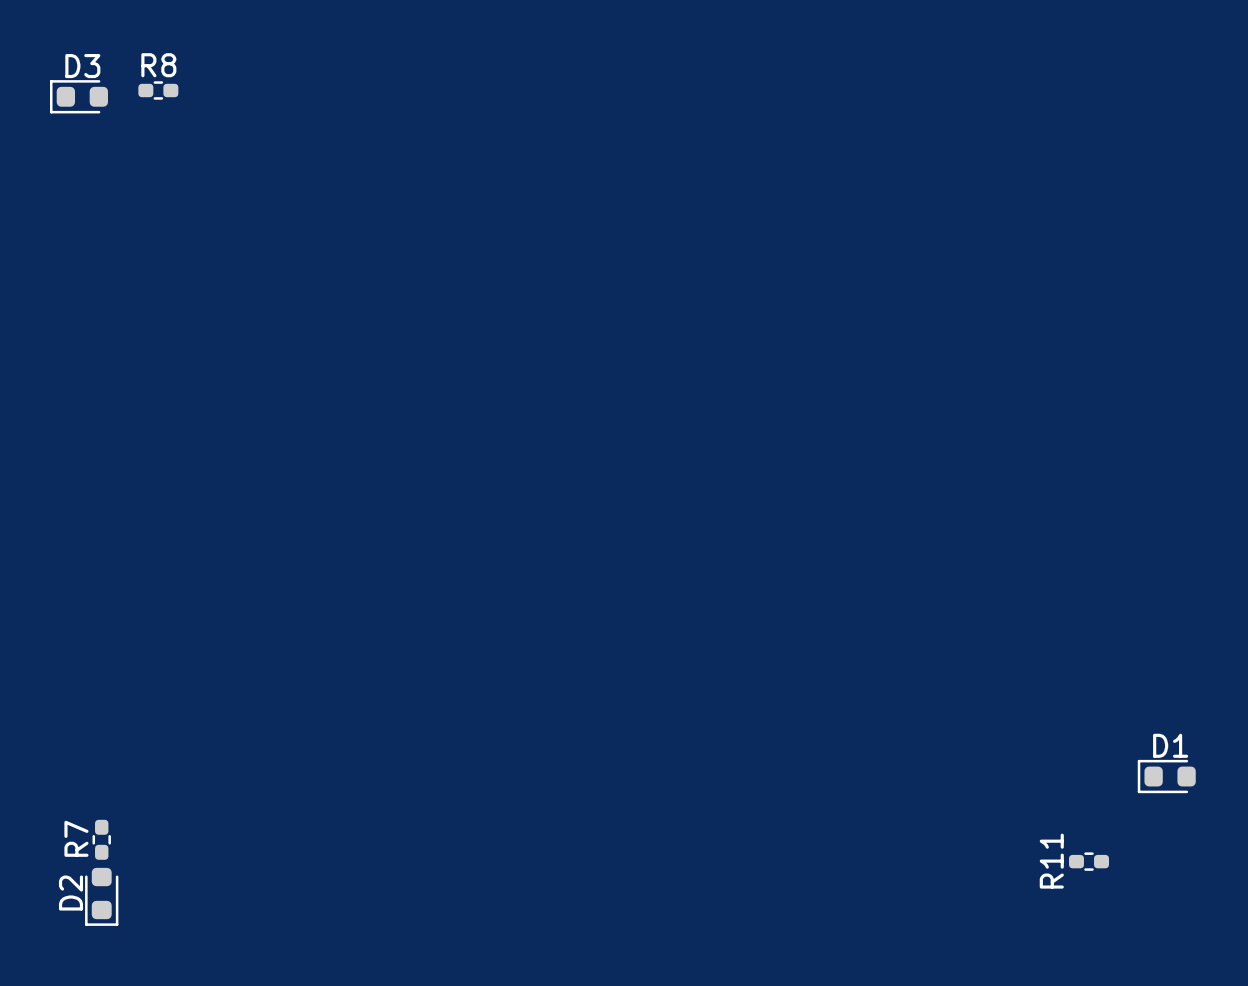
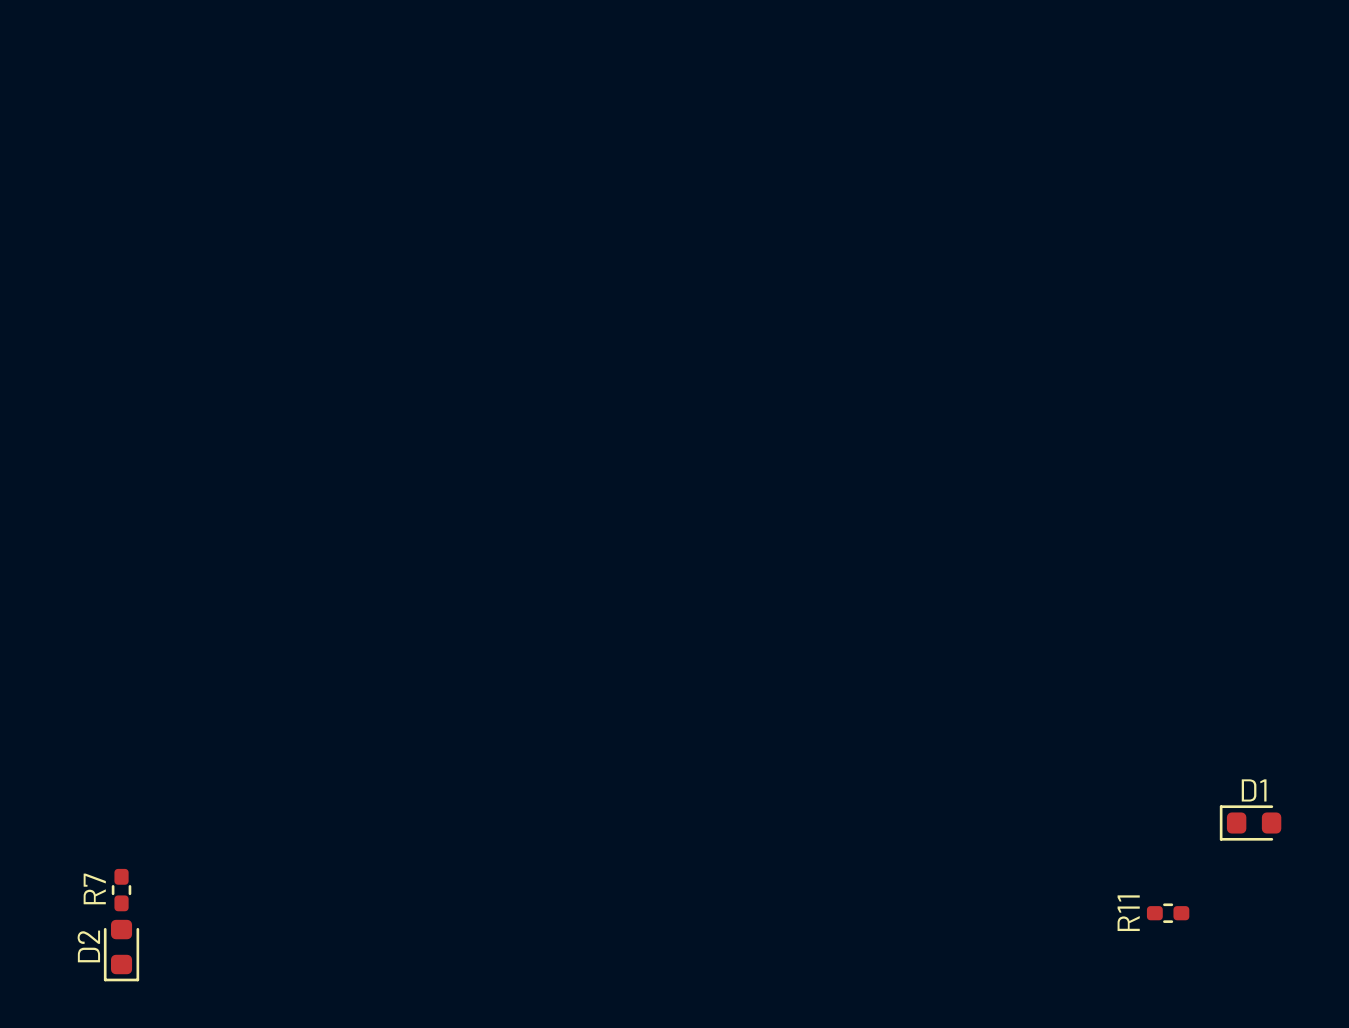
R8: (158, 90) -> none
D3: (78, 96) -> none

